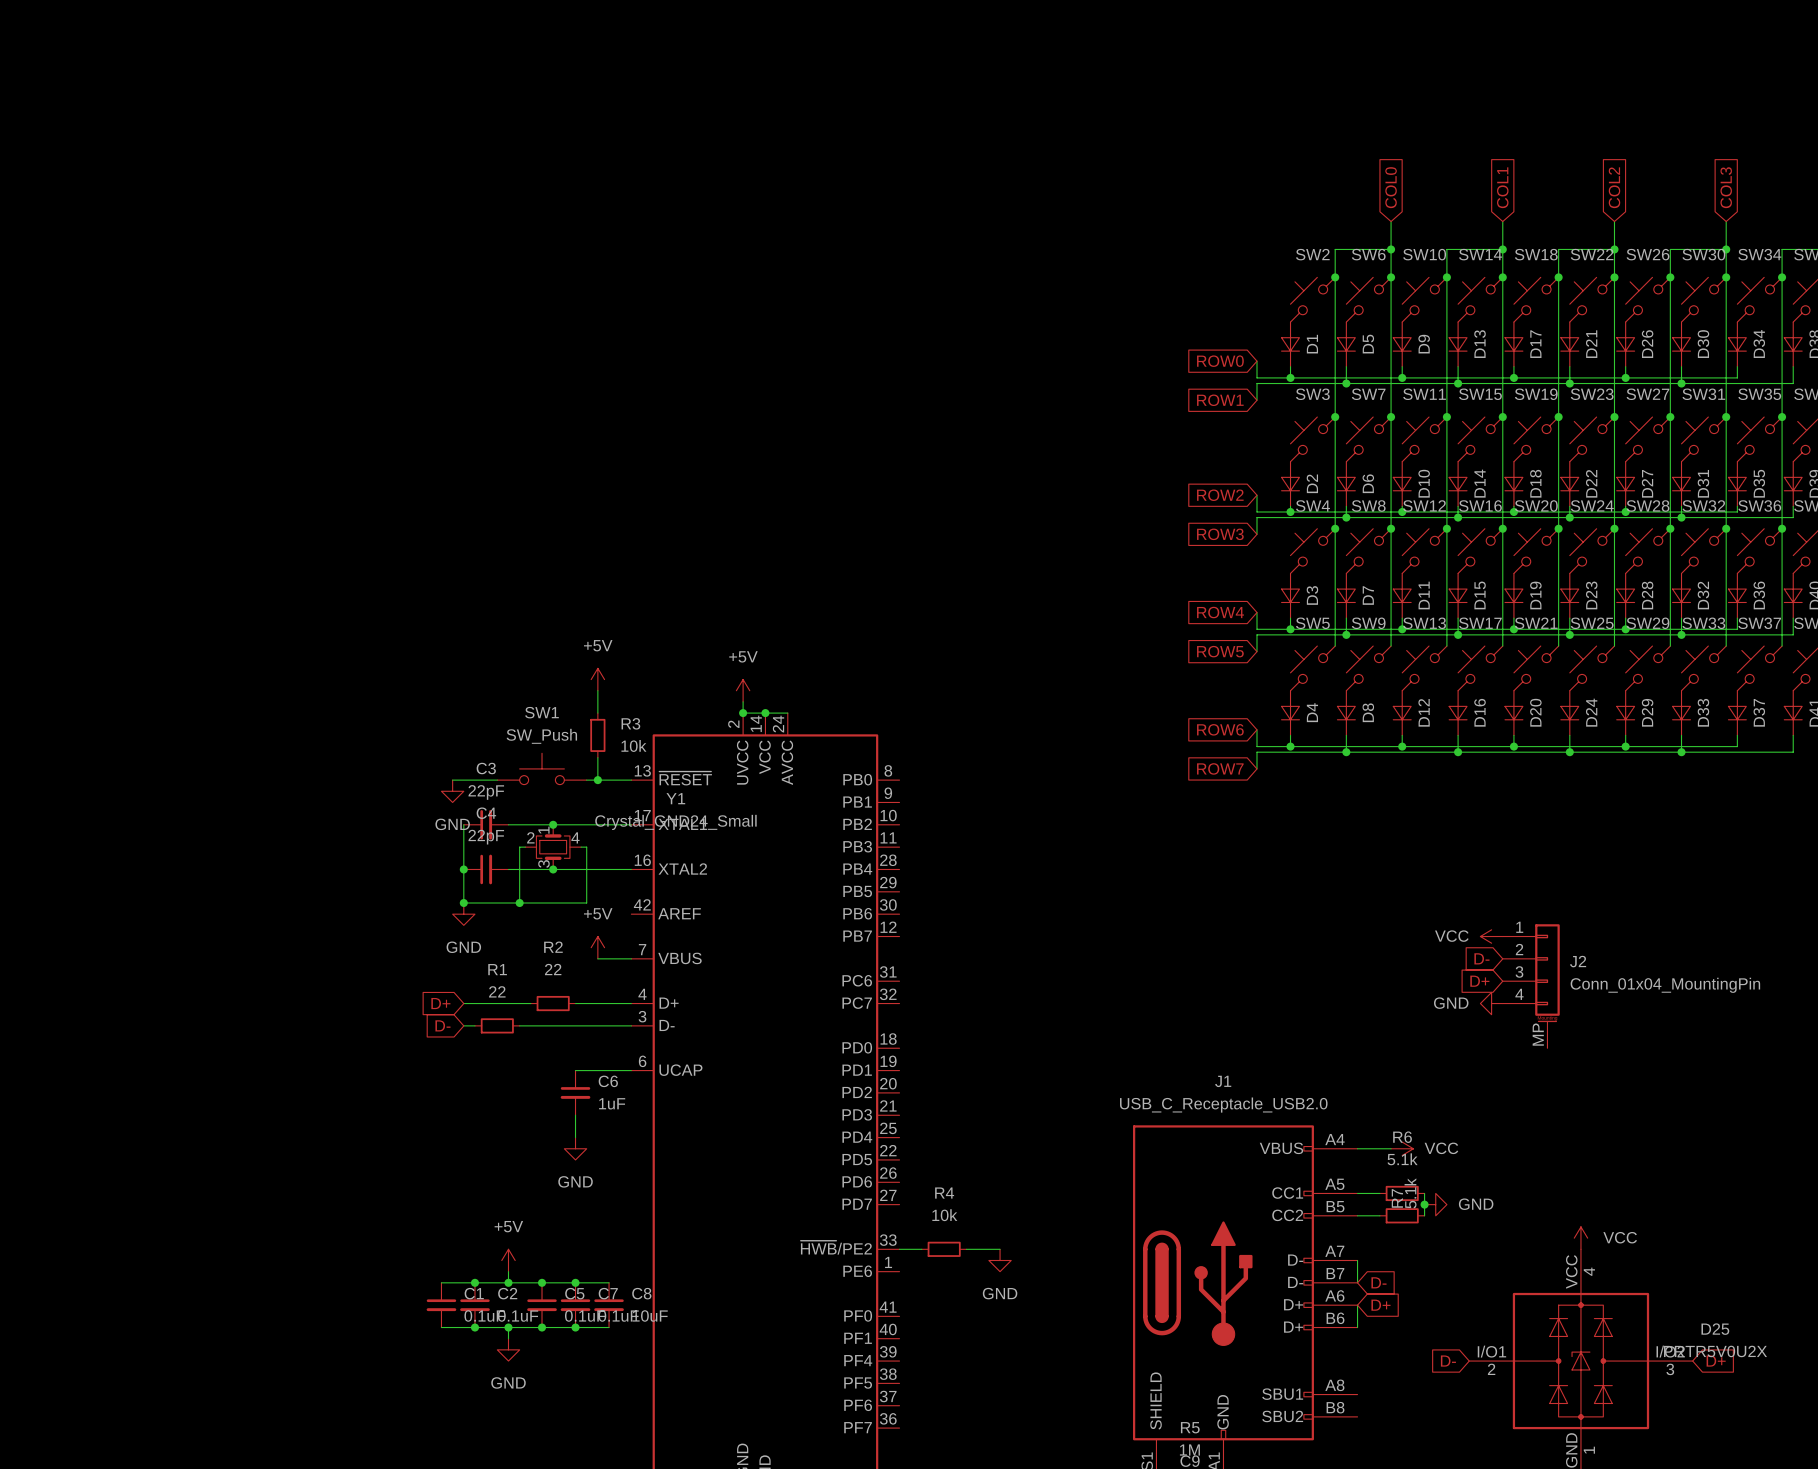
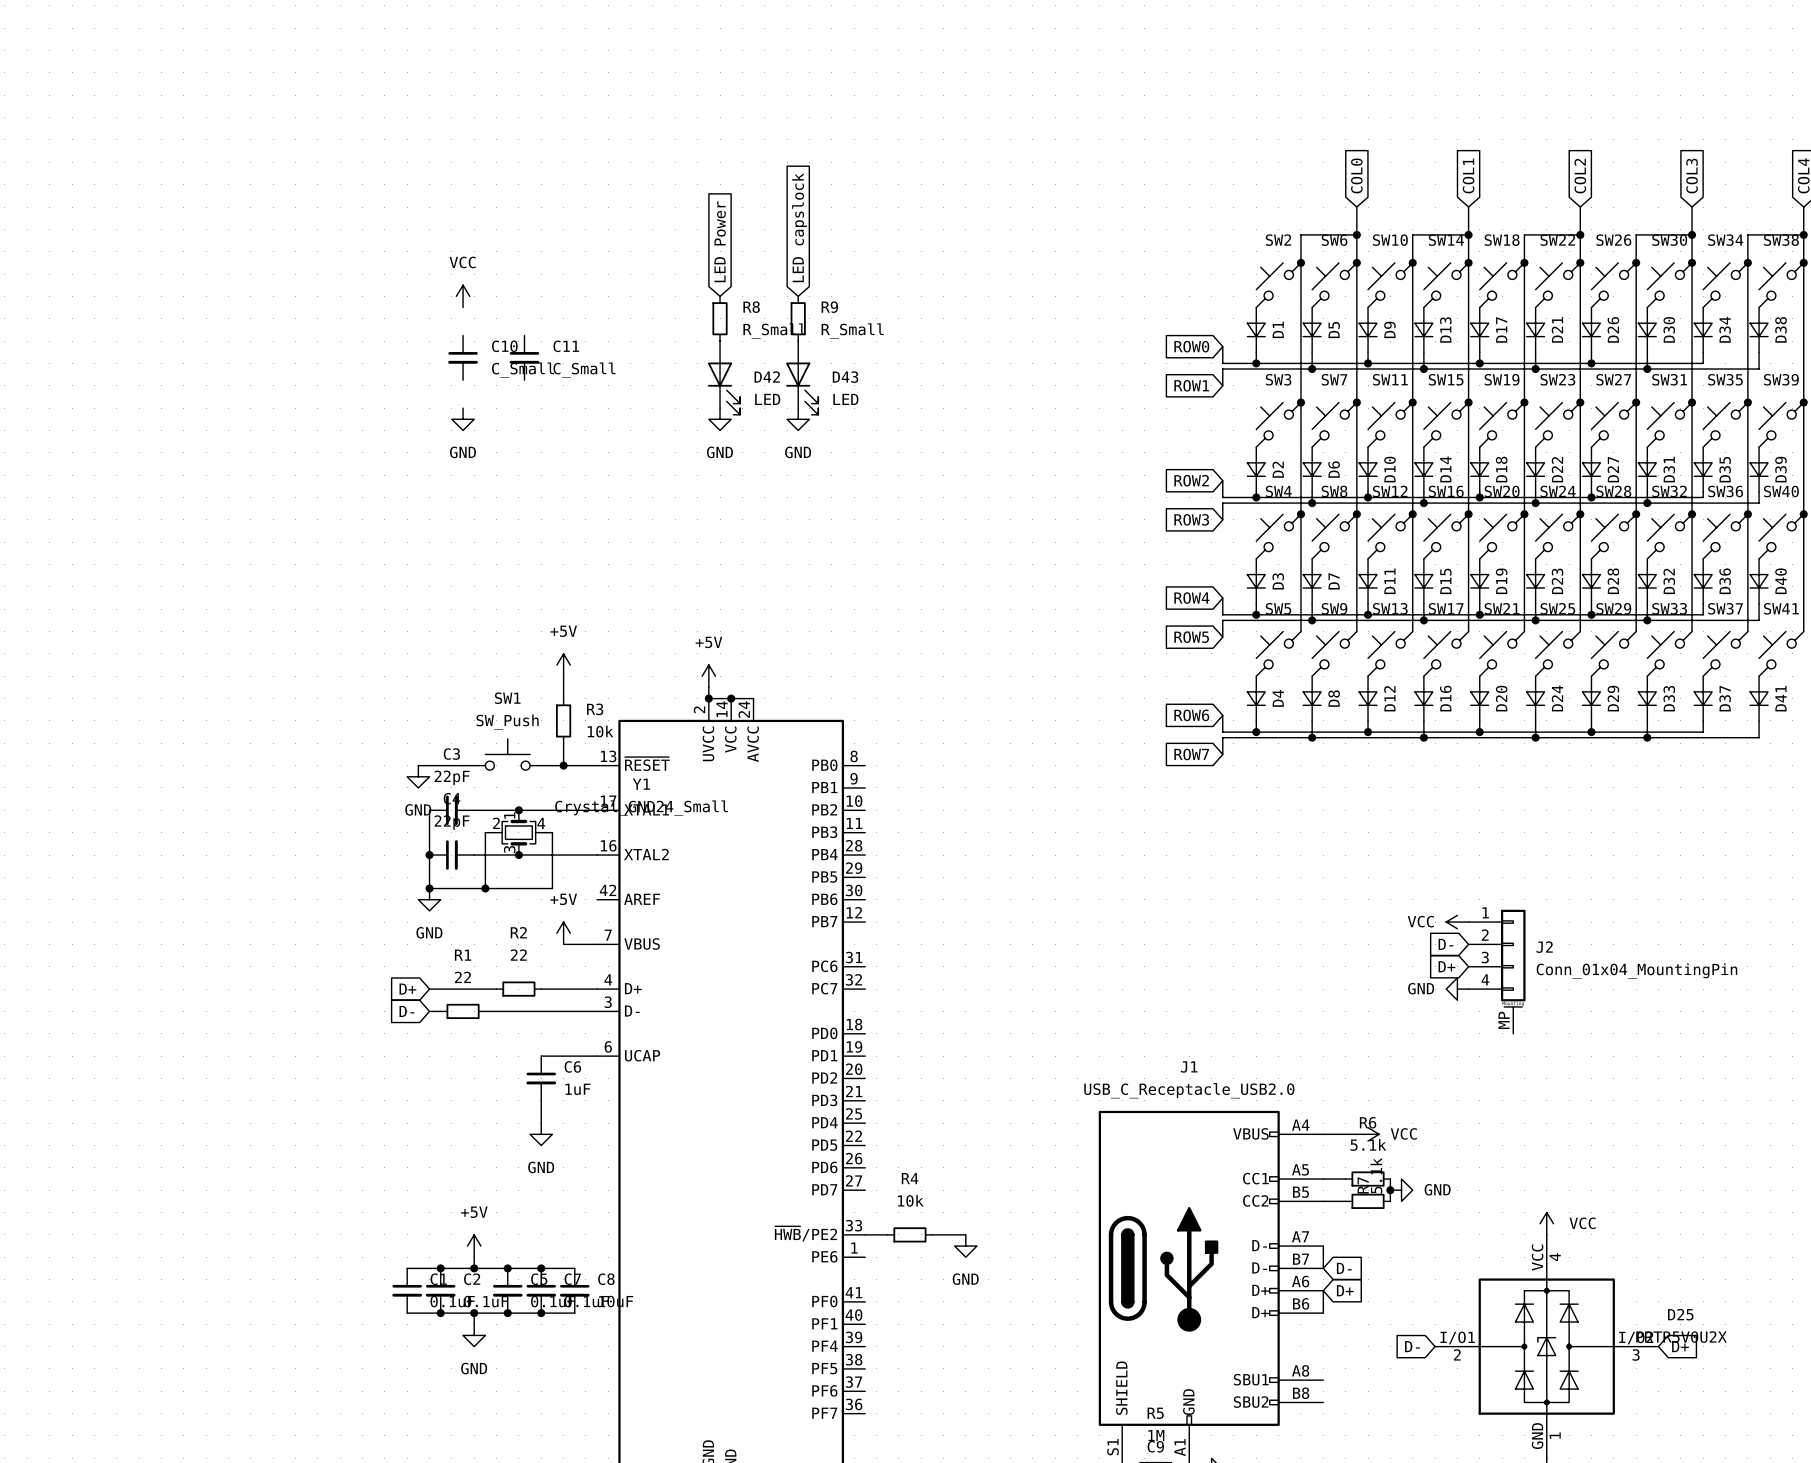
global label: none -> LED capslock (799, 227)
global label: none -> LED Power (720, 241)
power symbol: none -> VCC (463, 296)
R8: none -> R_Small (720, 318)
R9: none -> R_Small (798, 318)
C10: none -> C_Small (463, 357)
C11: none -> C_Small (524, 357)
D42: none -> LED (724, 377)
D43: none -> LED (802, 377)
power symbol: none -> GND (463, 419)
power symbol: none -> GND (720, 419)
power symbol: none -> GND (798, 419)

